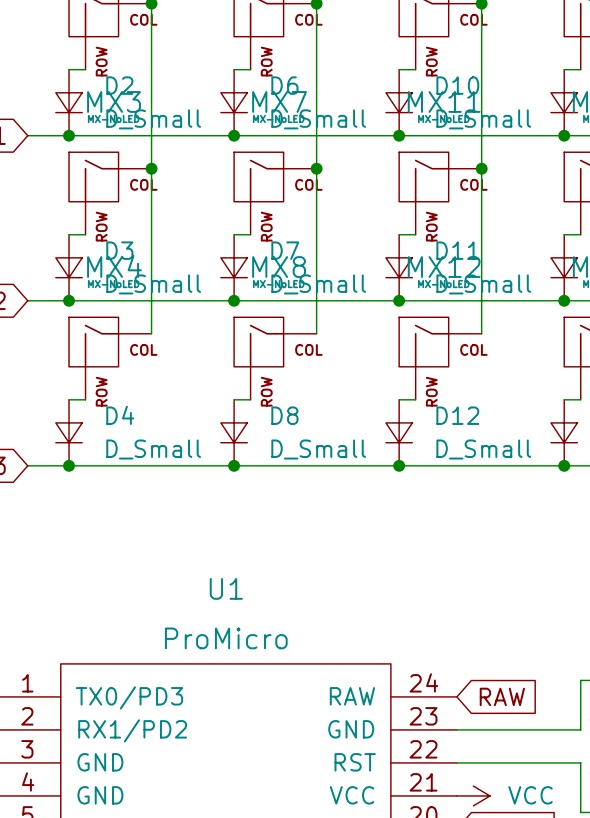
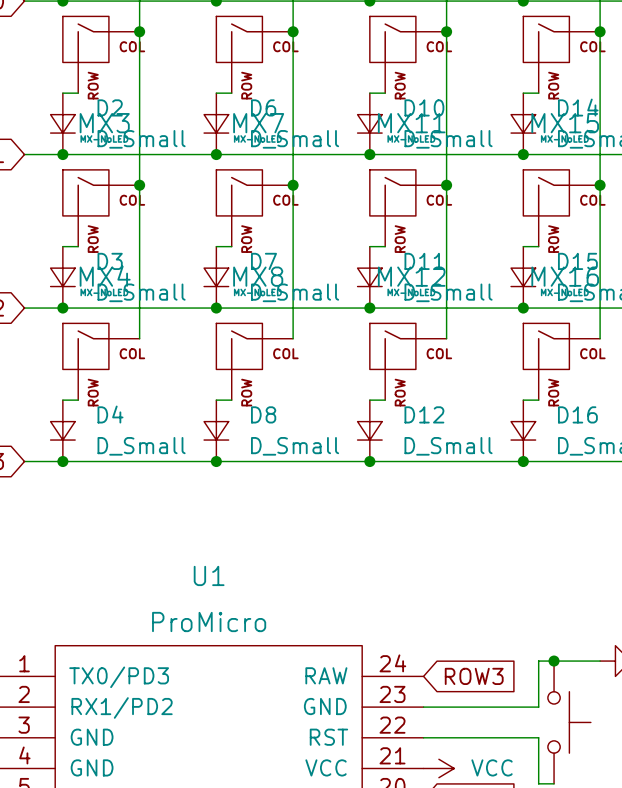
global label: RAW (502, 696) -> ROW3 (474, 676)

